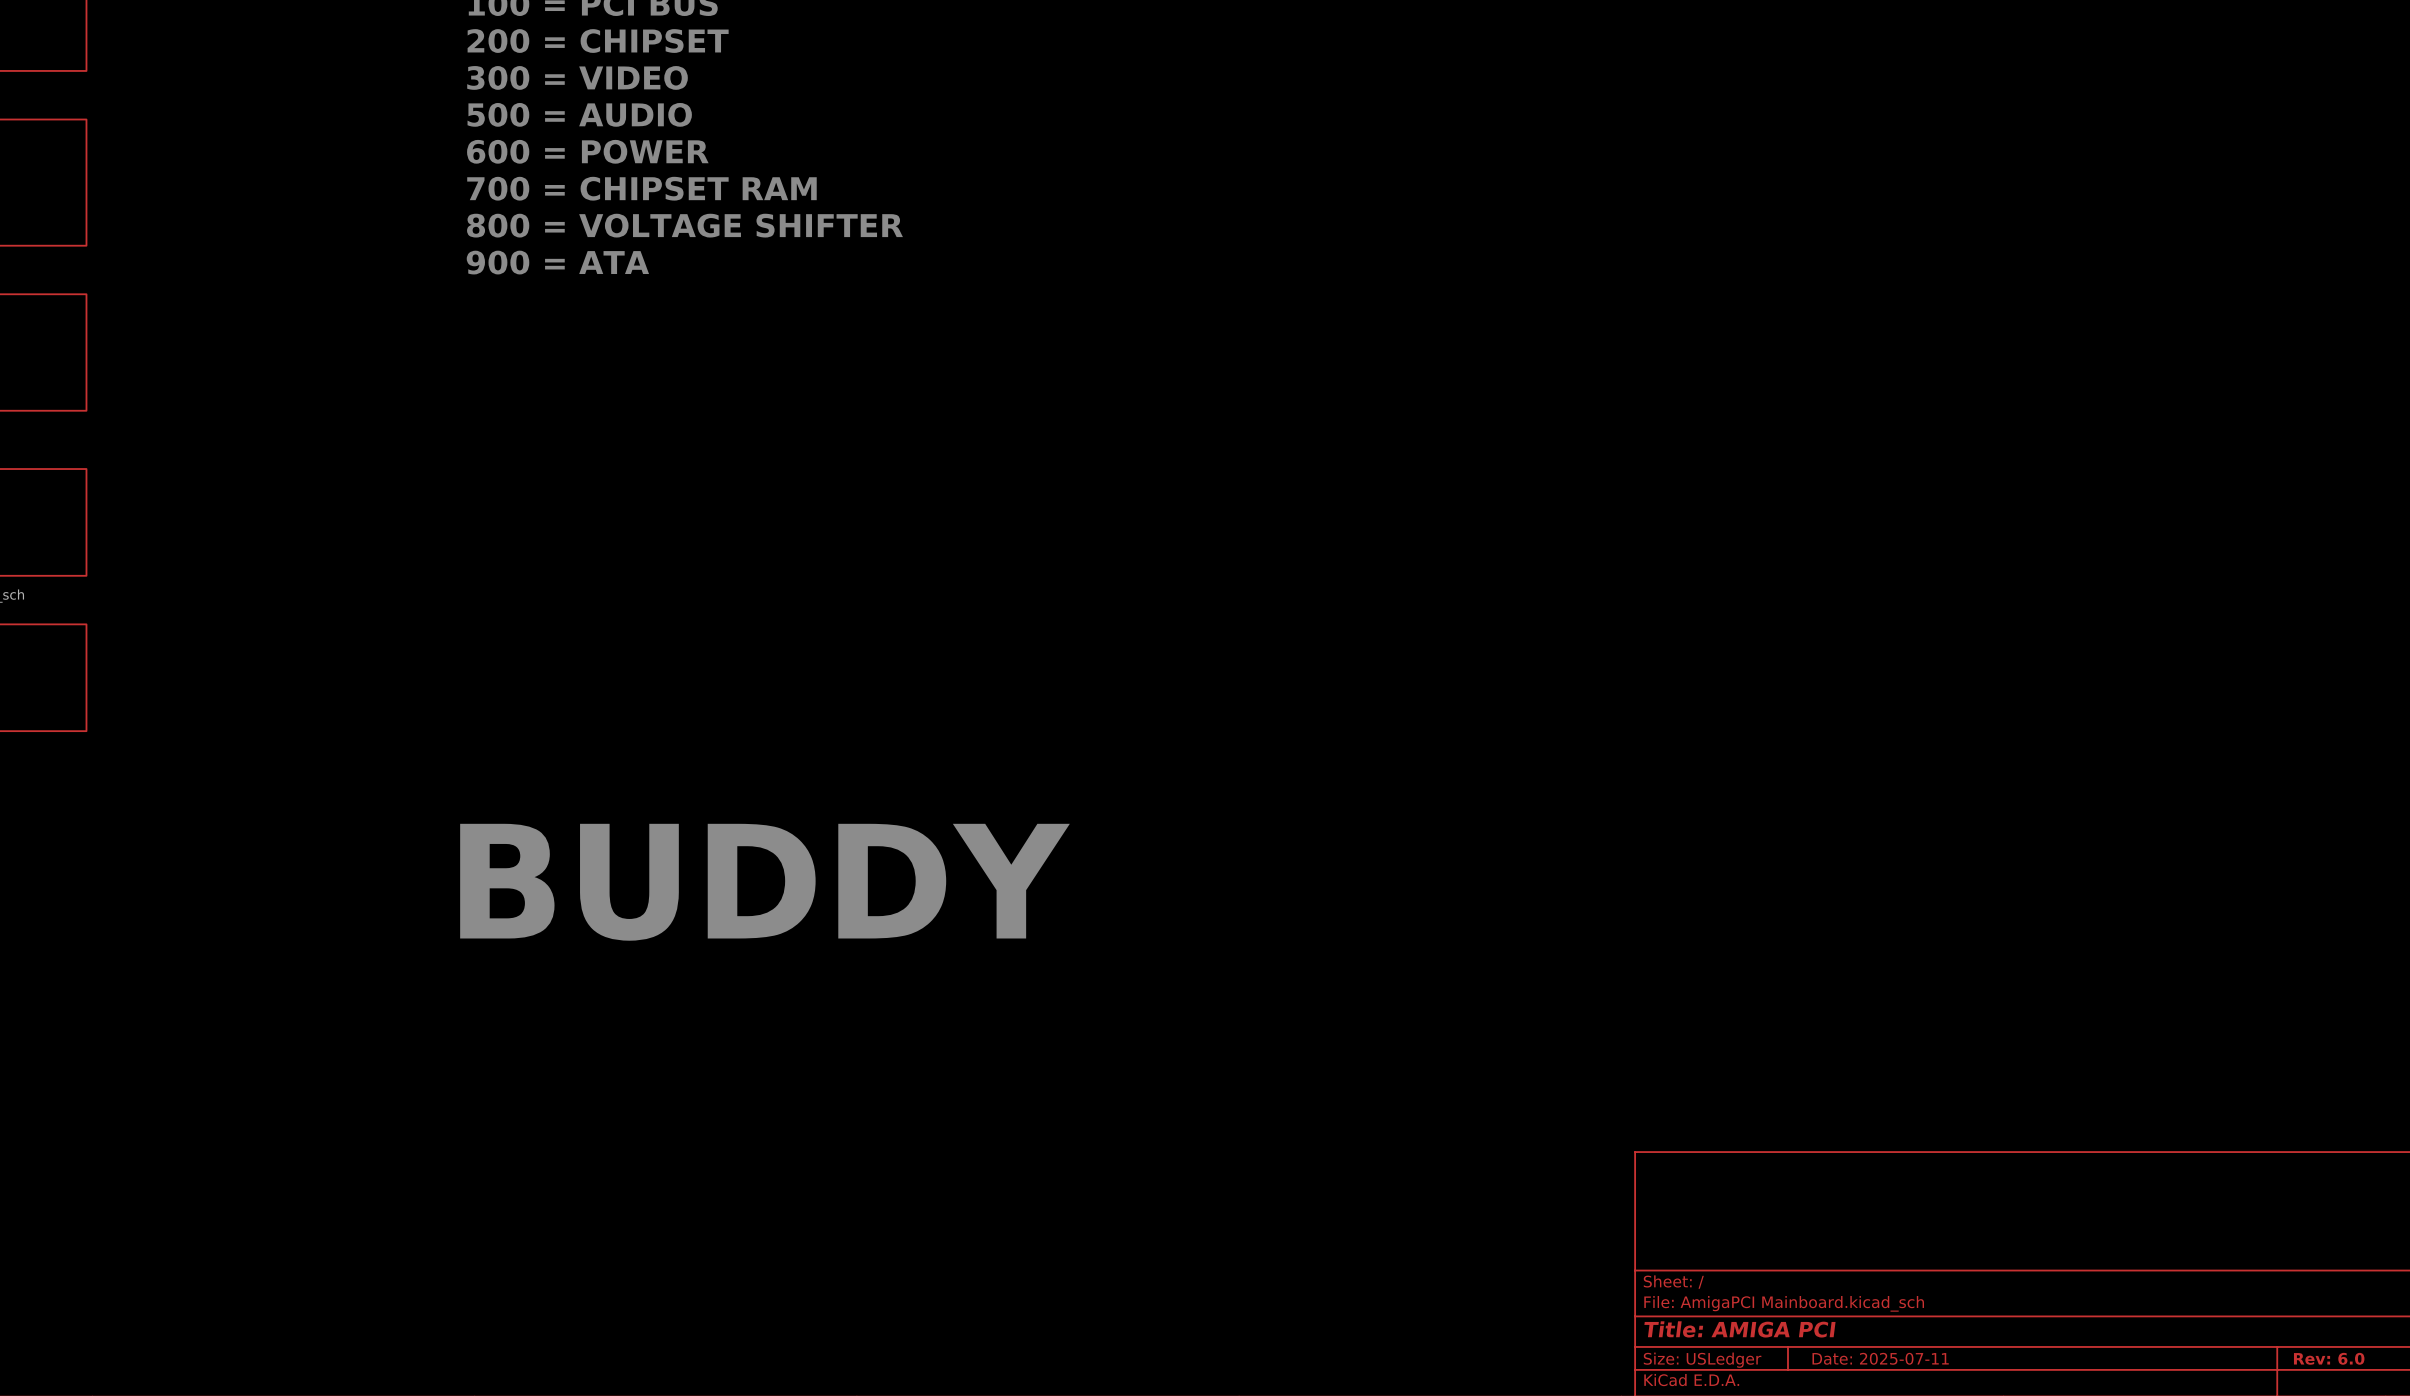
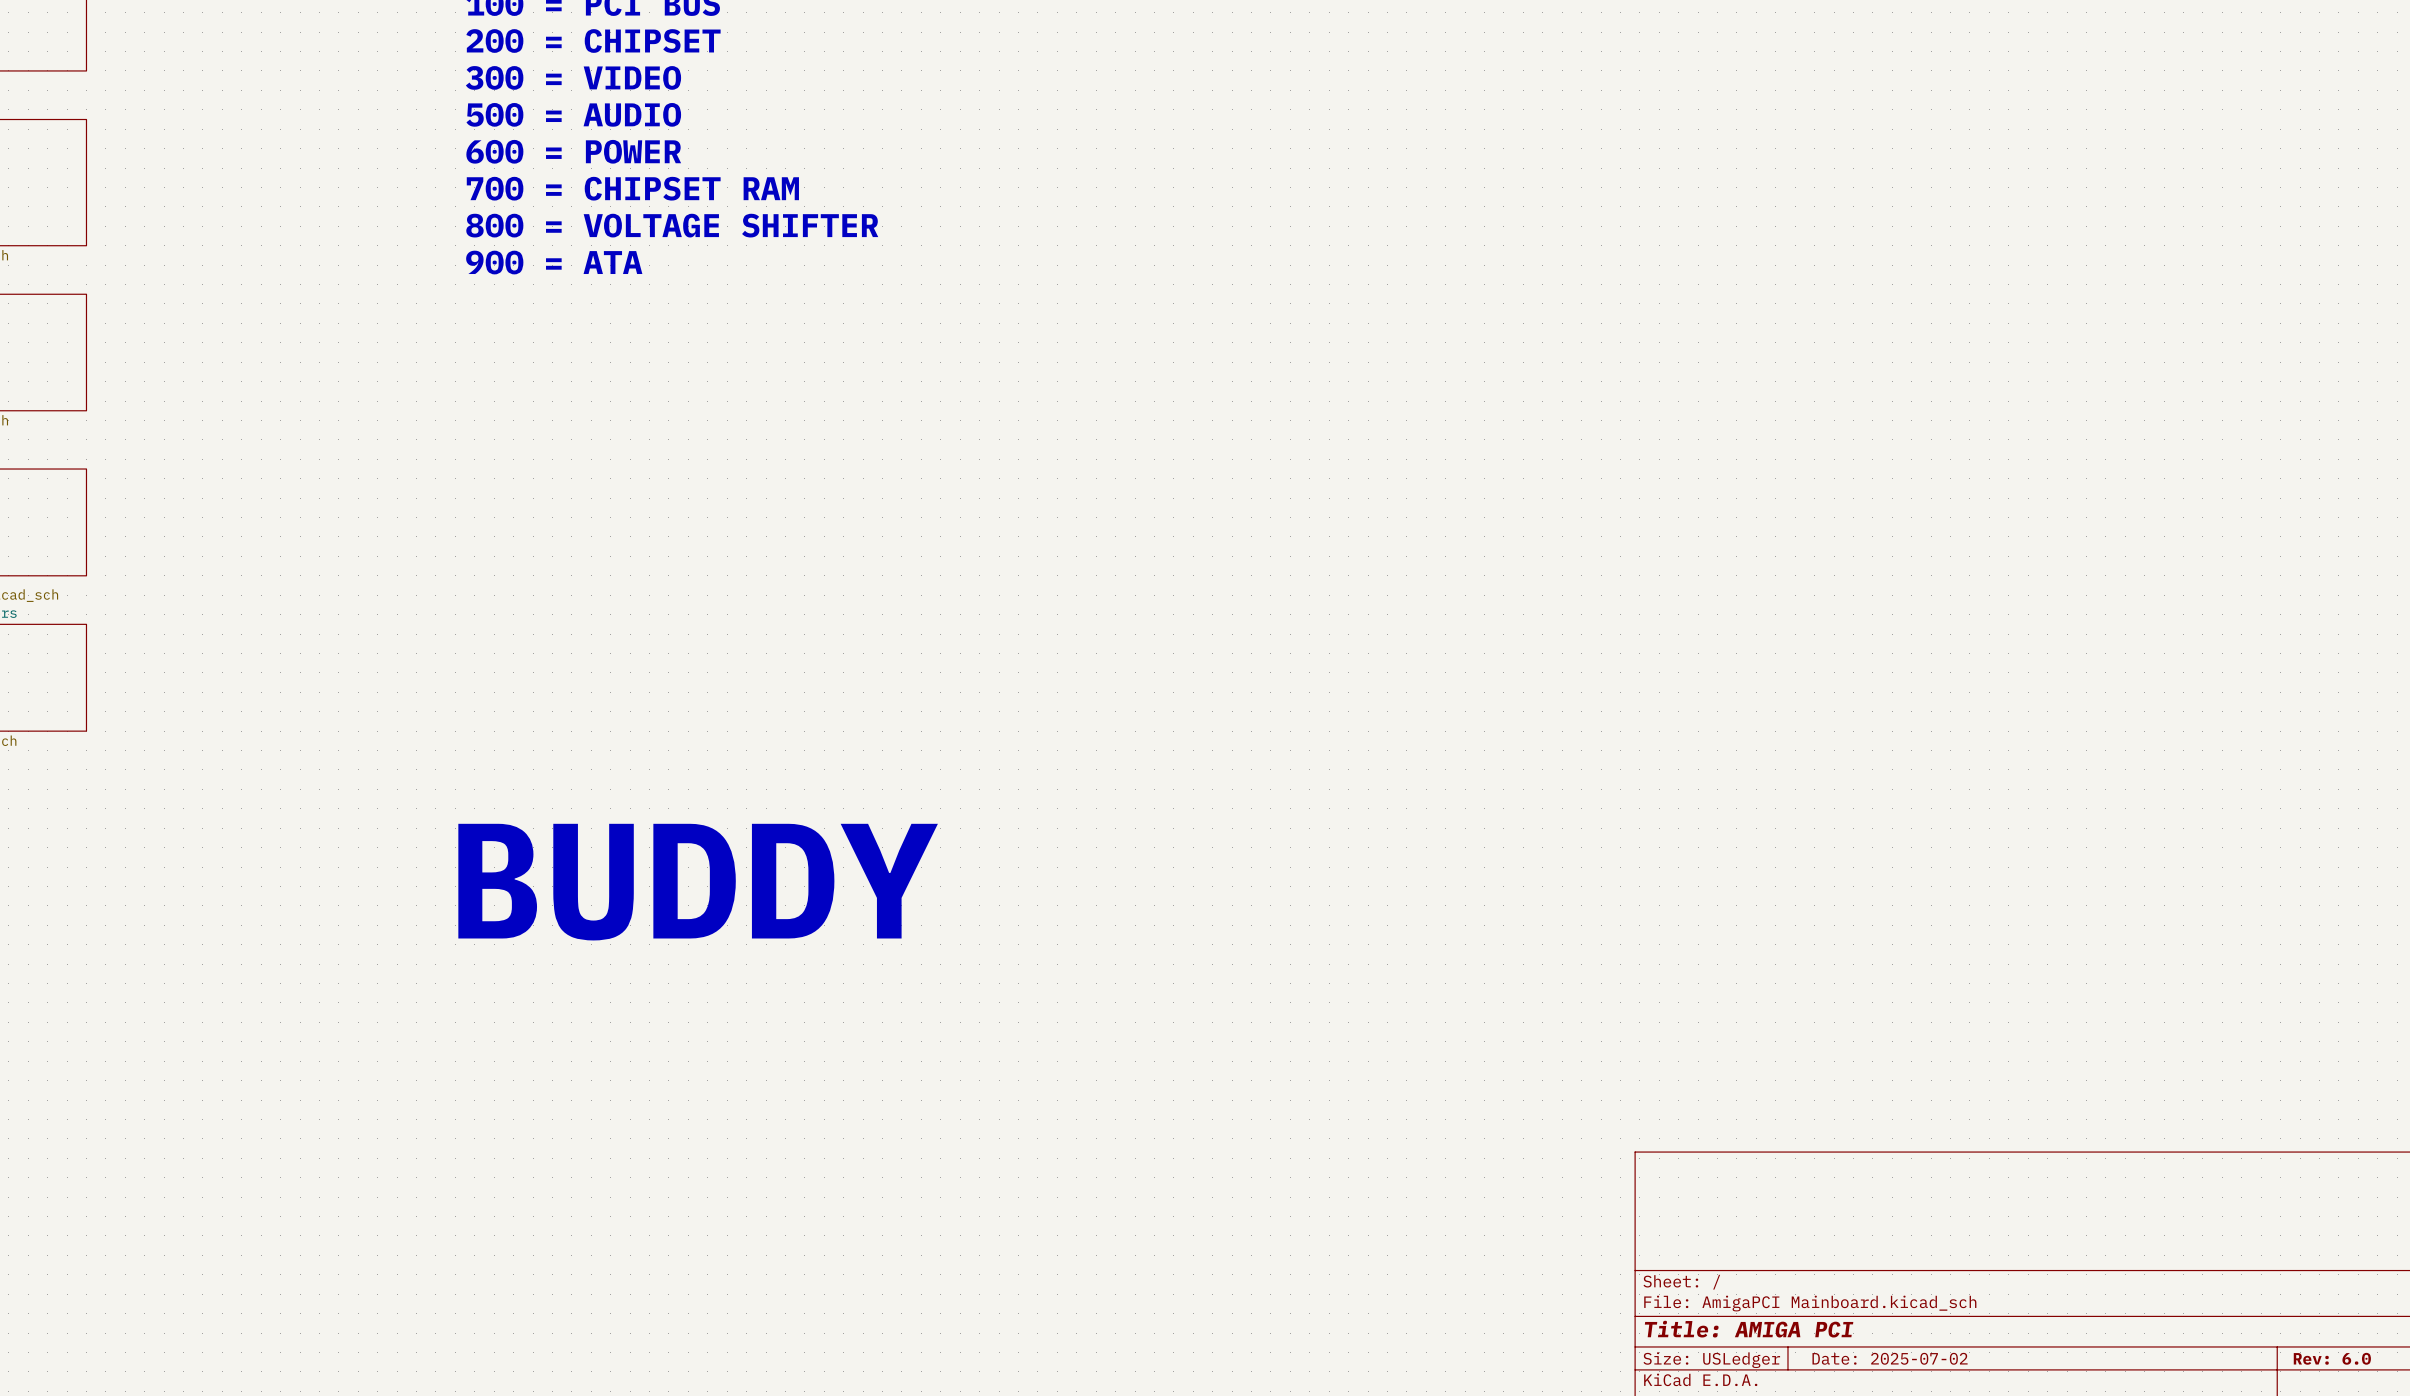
title block: Date: 2025-07-11 (1880, 1358) -> Date: 2025-07-02 (1890, 1358)

